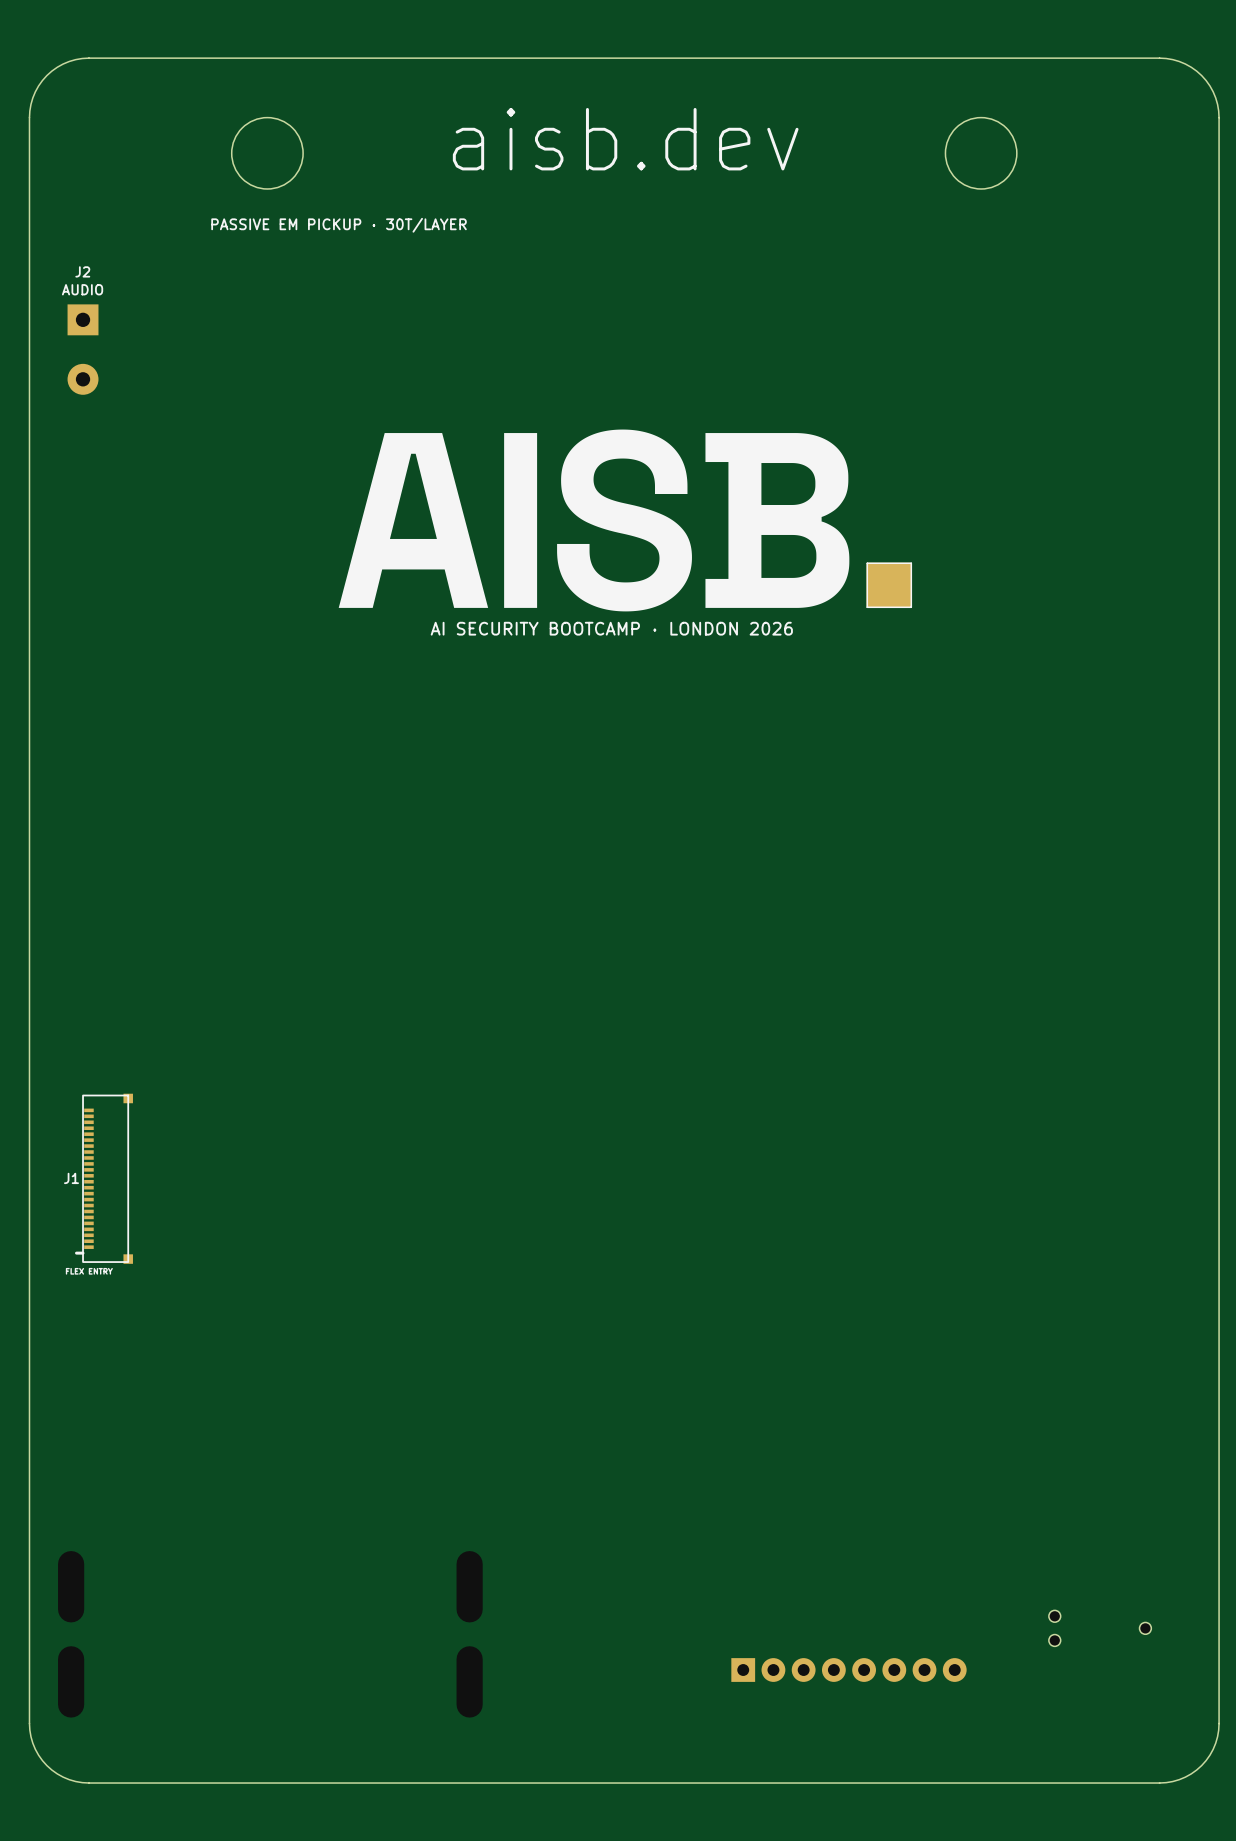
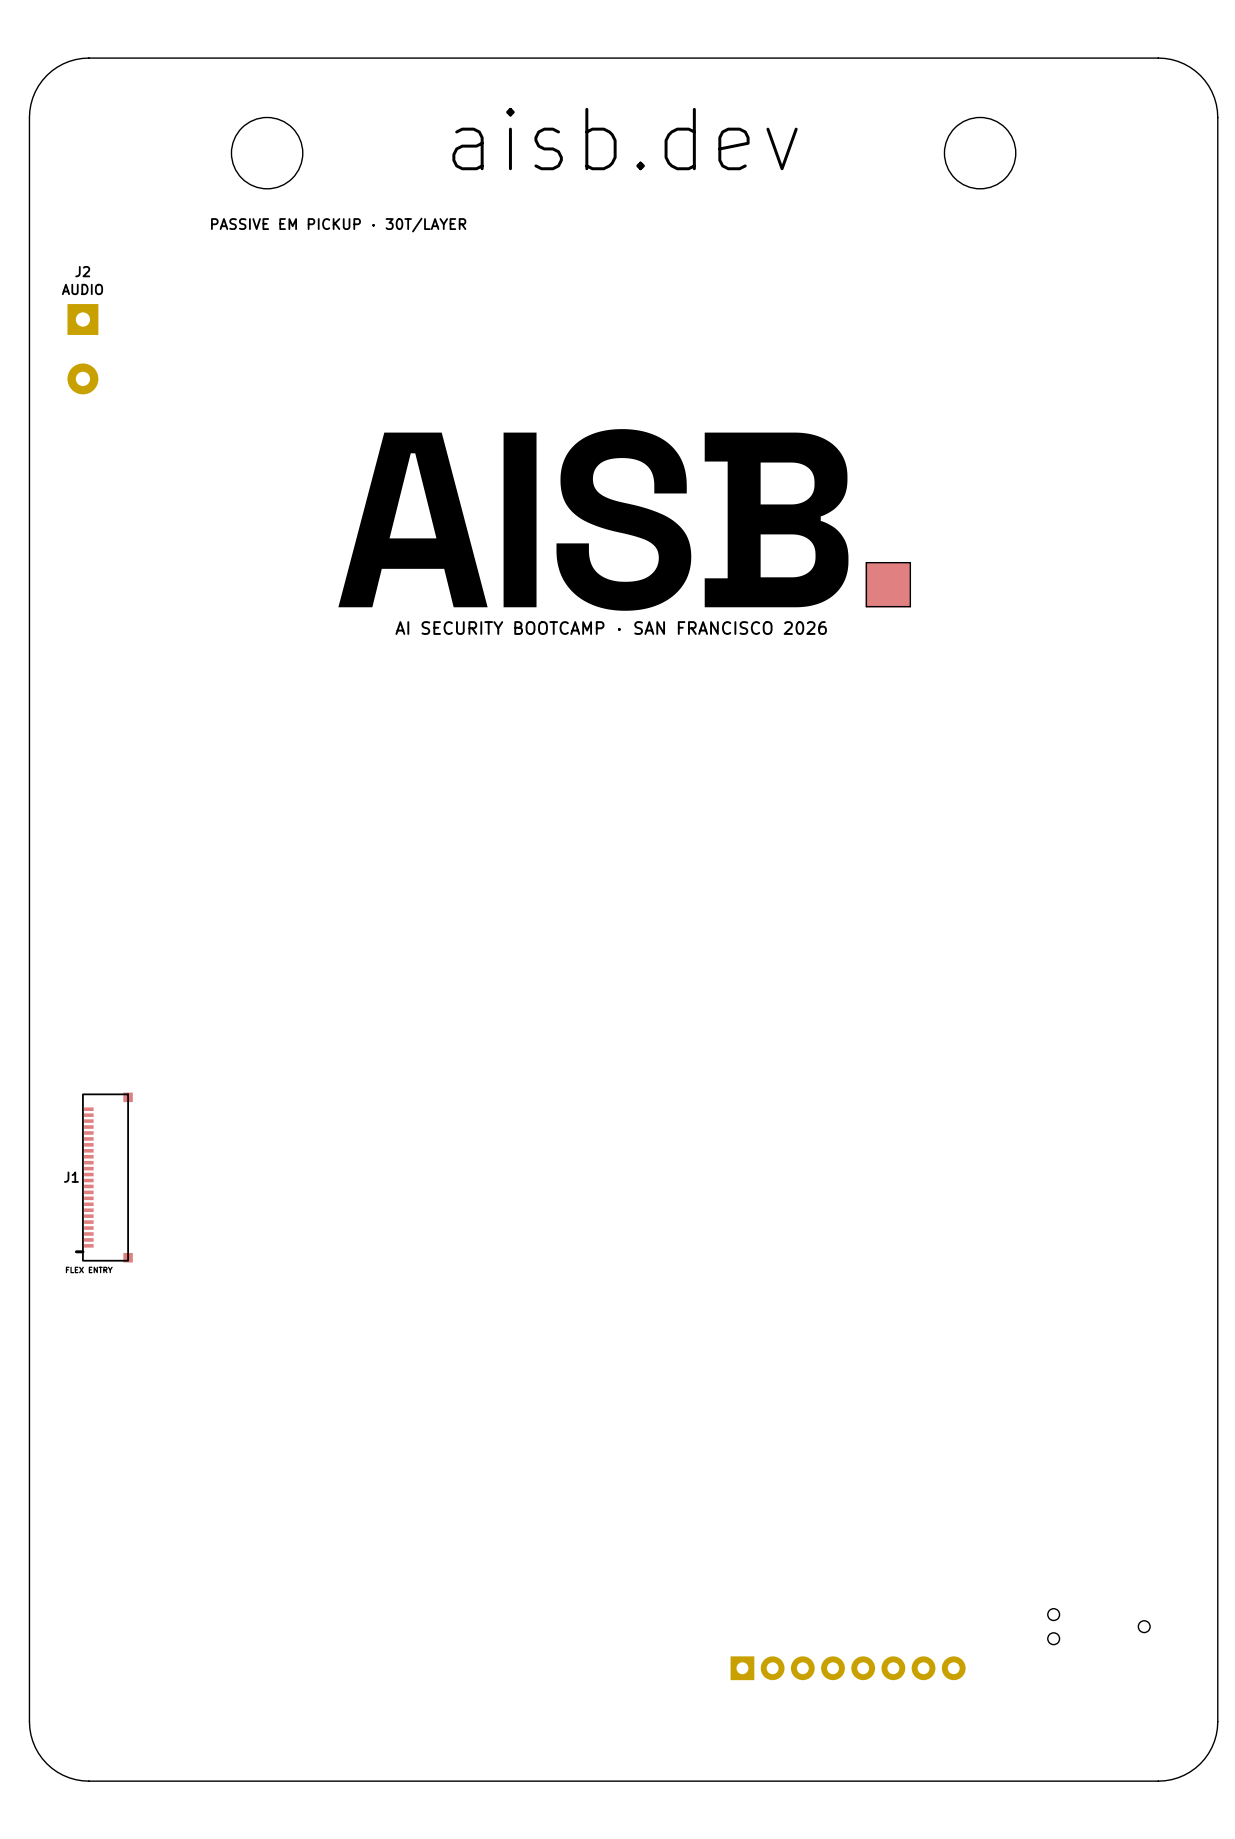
text: AI SECURITY BOOTCAMP · LONDON 2026 (611, 628) -> AI SECURITY BOOTCAMP · SAN FRANCISCO 2026 (611, 628)

